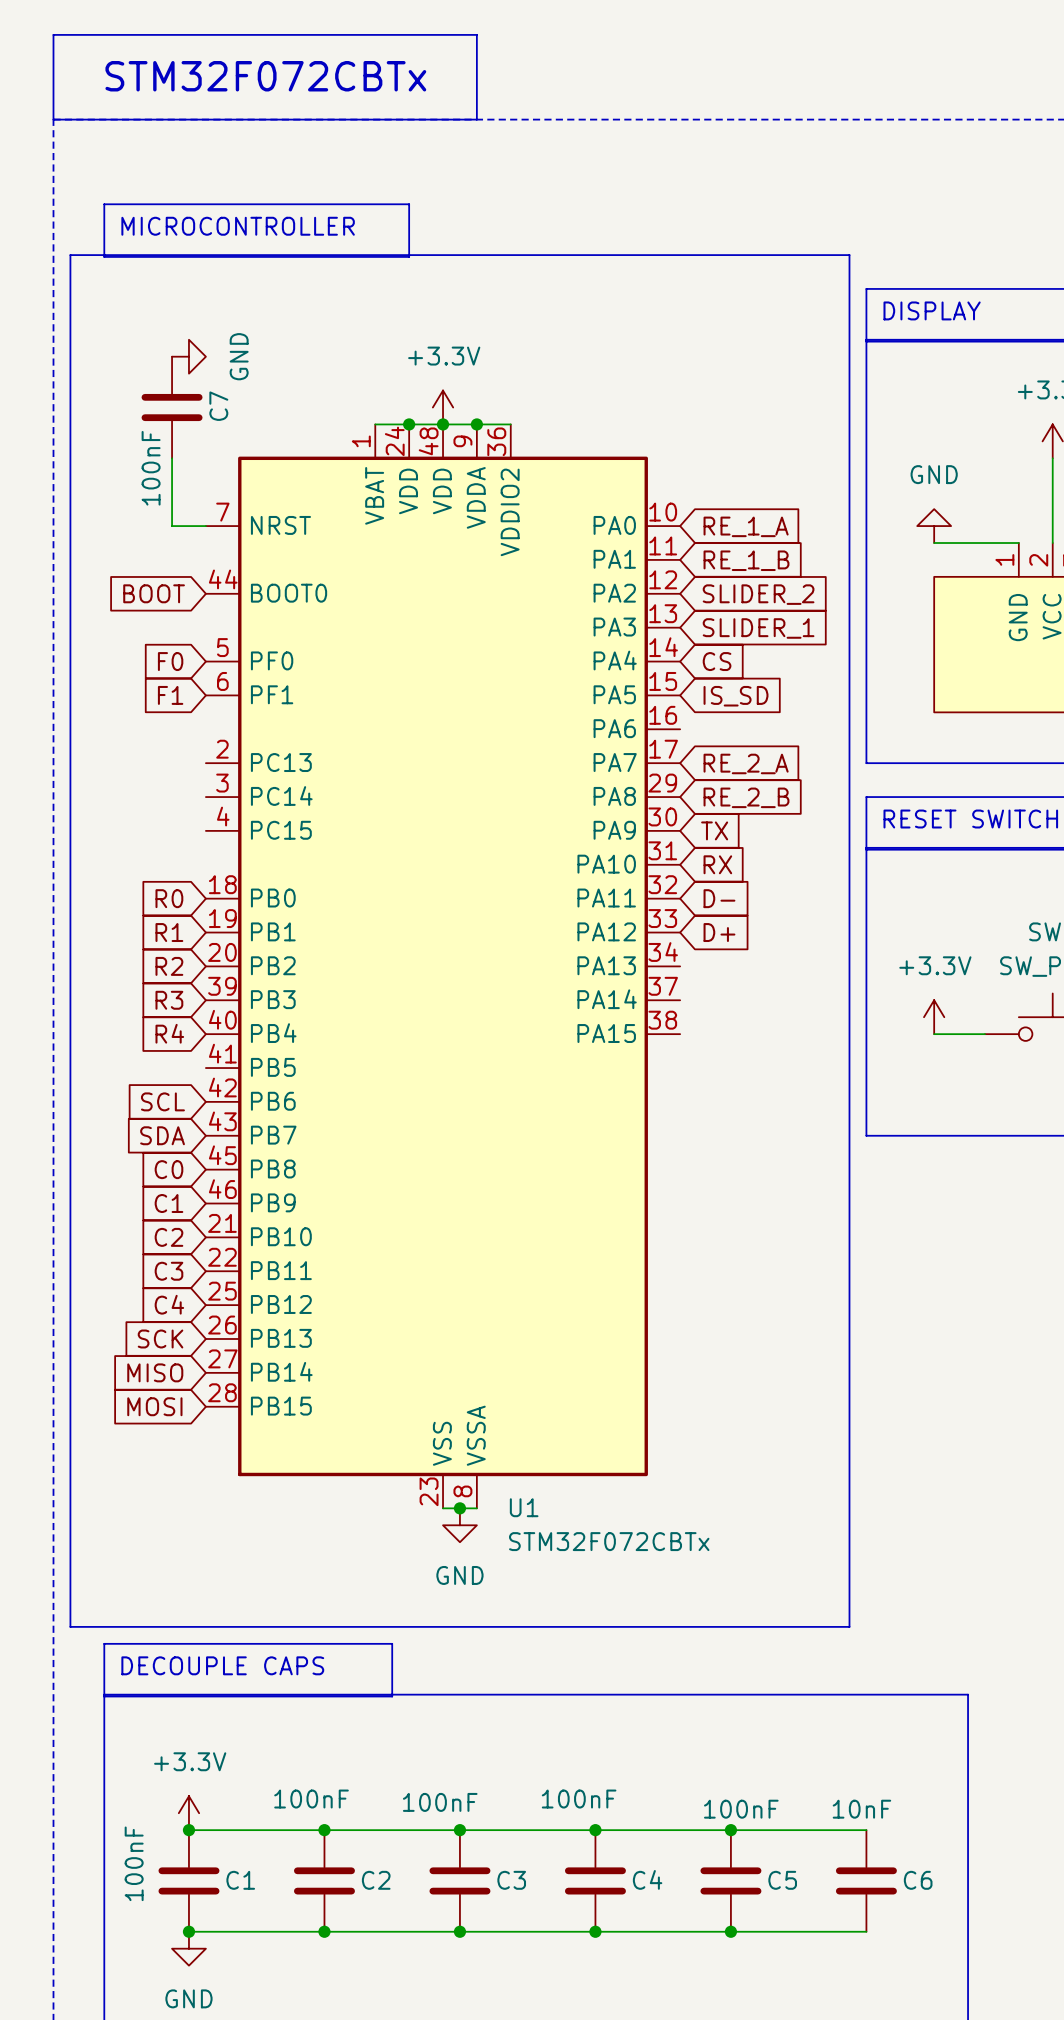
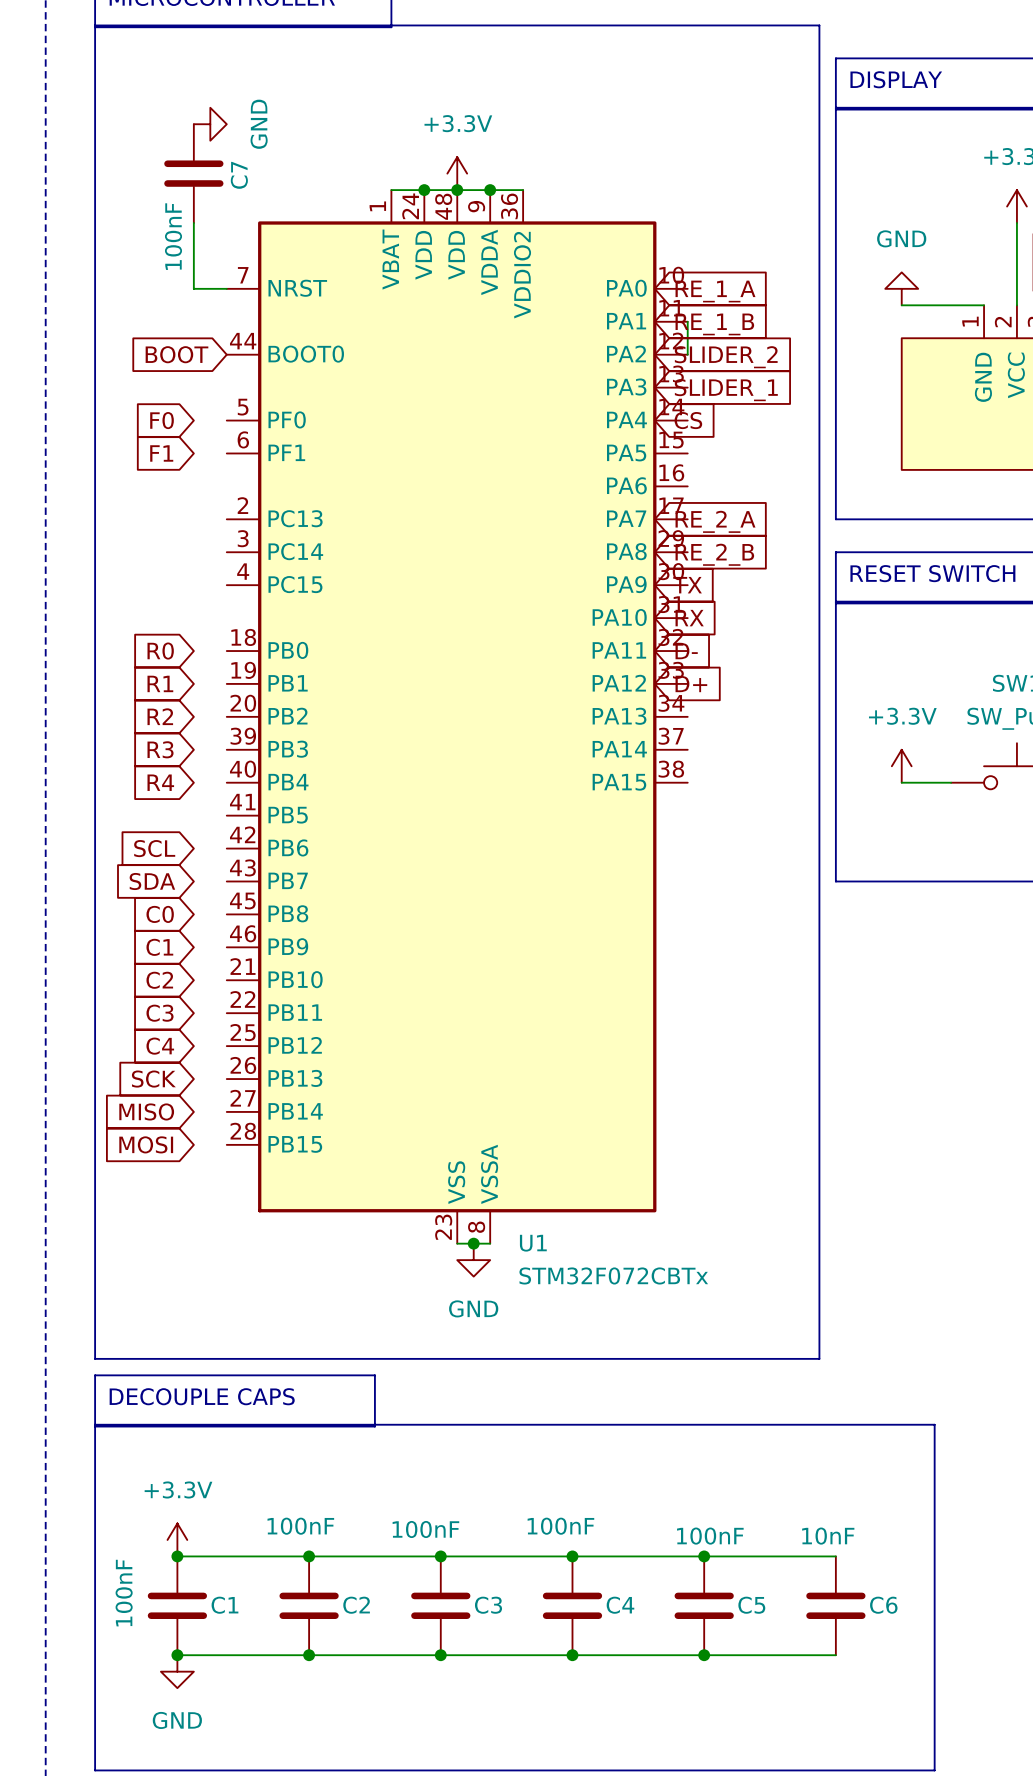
line: (104, 255) (70, 255) (70, 1626) (104, 1626) -> (95, 27) (95, 1358)
power symbol position: GND (188, 356) -> GND (210, 124)
C7 position: (172, 407) -> (193, 173)
power symbol position: +3.3V (443, 407) -> +3.3V (457, 173)
wire: (375, 424) (409, 424) -> (490, 190) (523, 190)
junction: (409, 424) -> none
junction: none -> (490, 190)
wire: (172, 458) (172, 526) (205, 526) -> (193, 223) (193, 288) (226, 288)
wire: none -> (687, 321) (687, 354)
global label position: BOOT (154, 593) -> BOOT (176, 354)
global label: IS_SD (736, 696) -> none
U1 position: (443, 966) -> (457, 716)
wire: (443, 1508) (476, 1508) -> (490, 1243) (457, 1243)
junction position: (459, 1508) -> (473, 1243)
power symbol position: GND (459, 1525) -> GND (473, 1260)

